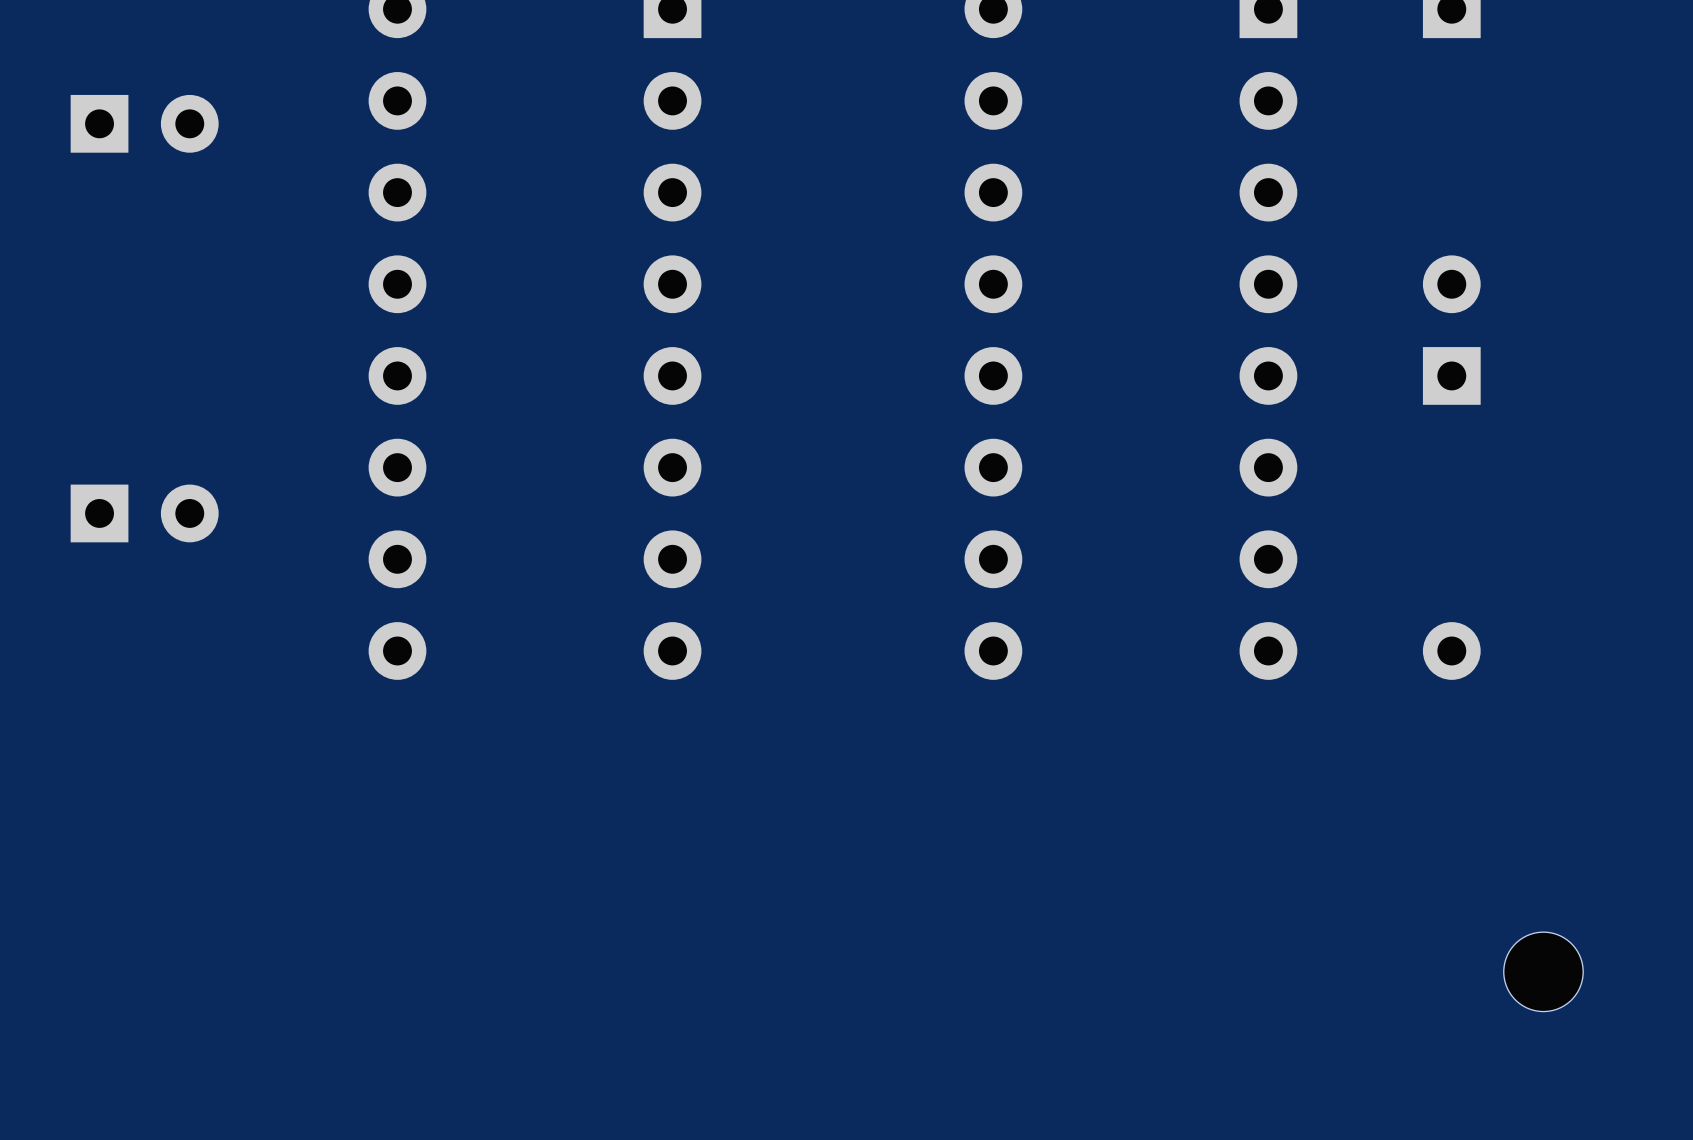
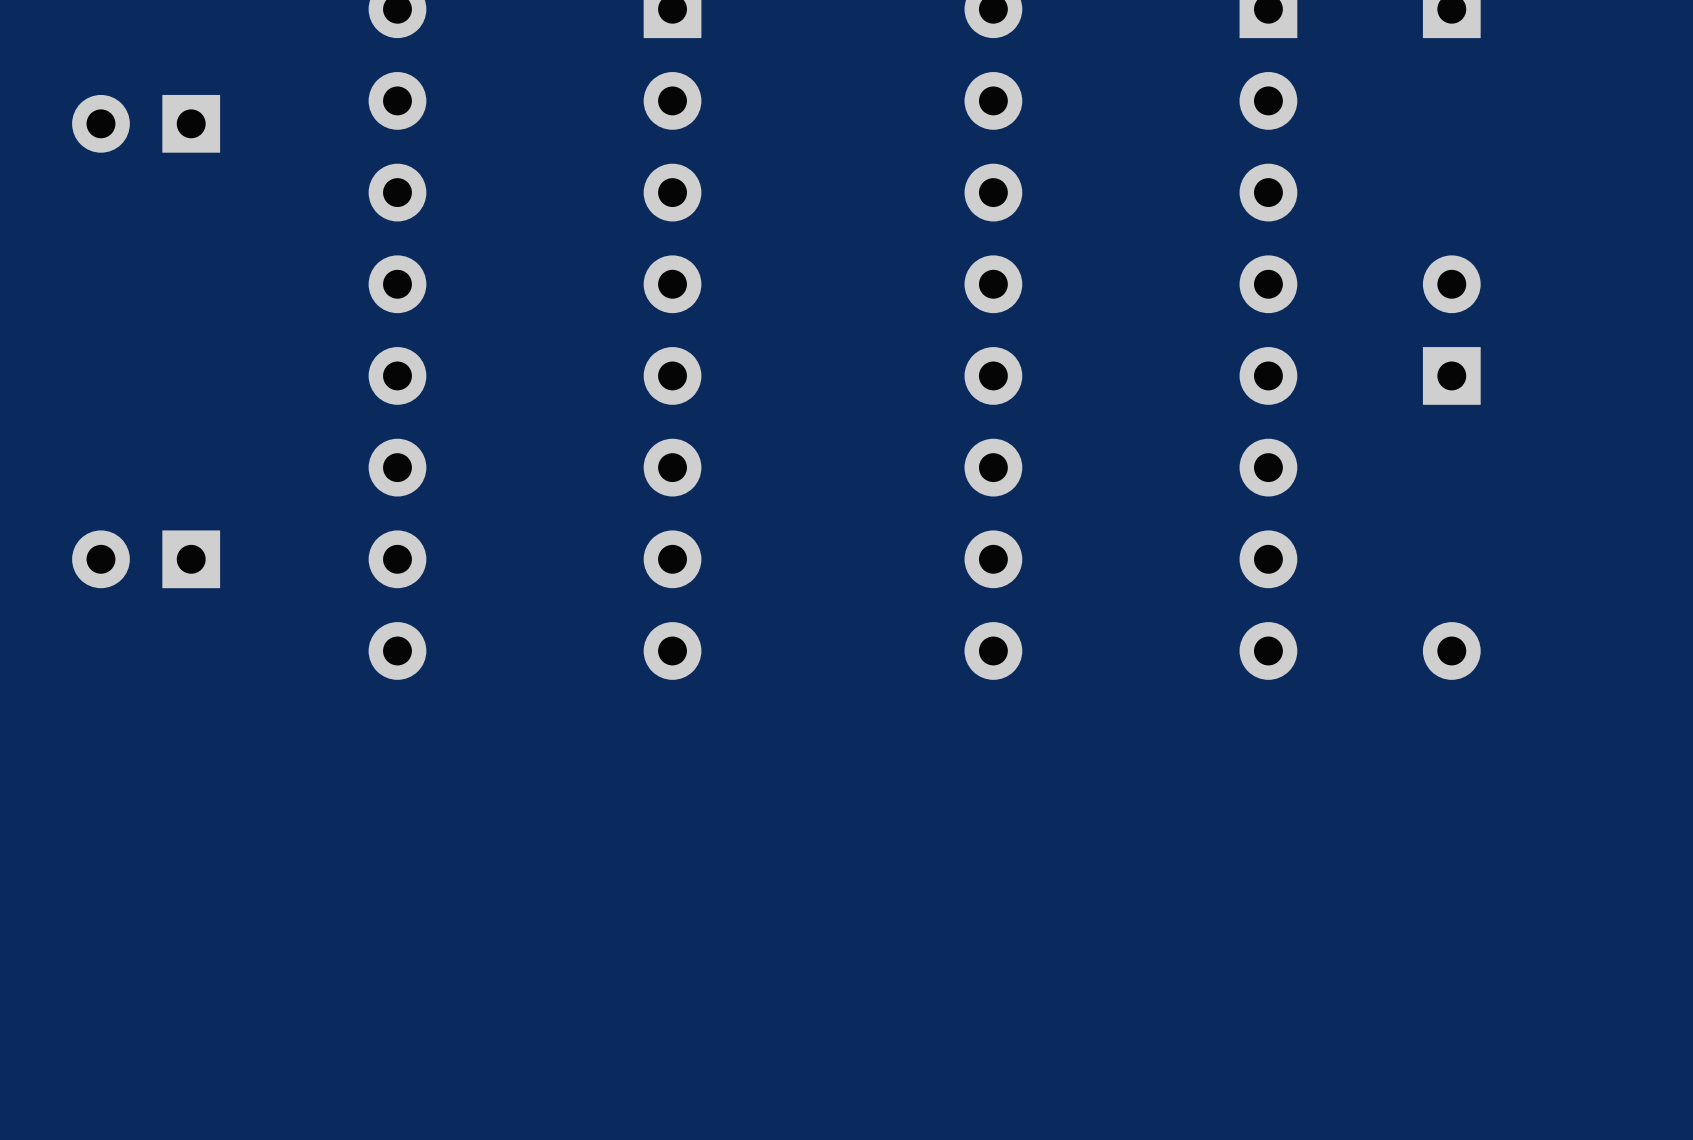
part rotation: 0° (144, 123) -> 180° (146, 123)
part rotation: 0° (144, 513) -> 180° (146, 559)
part: (1543, 971) -> none

